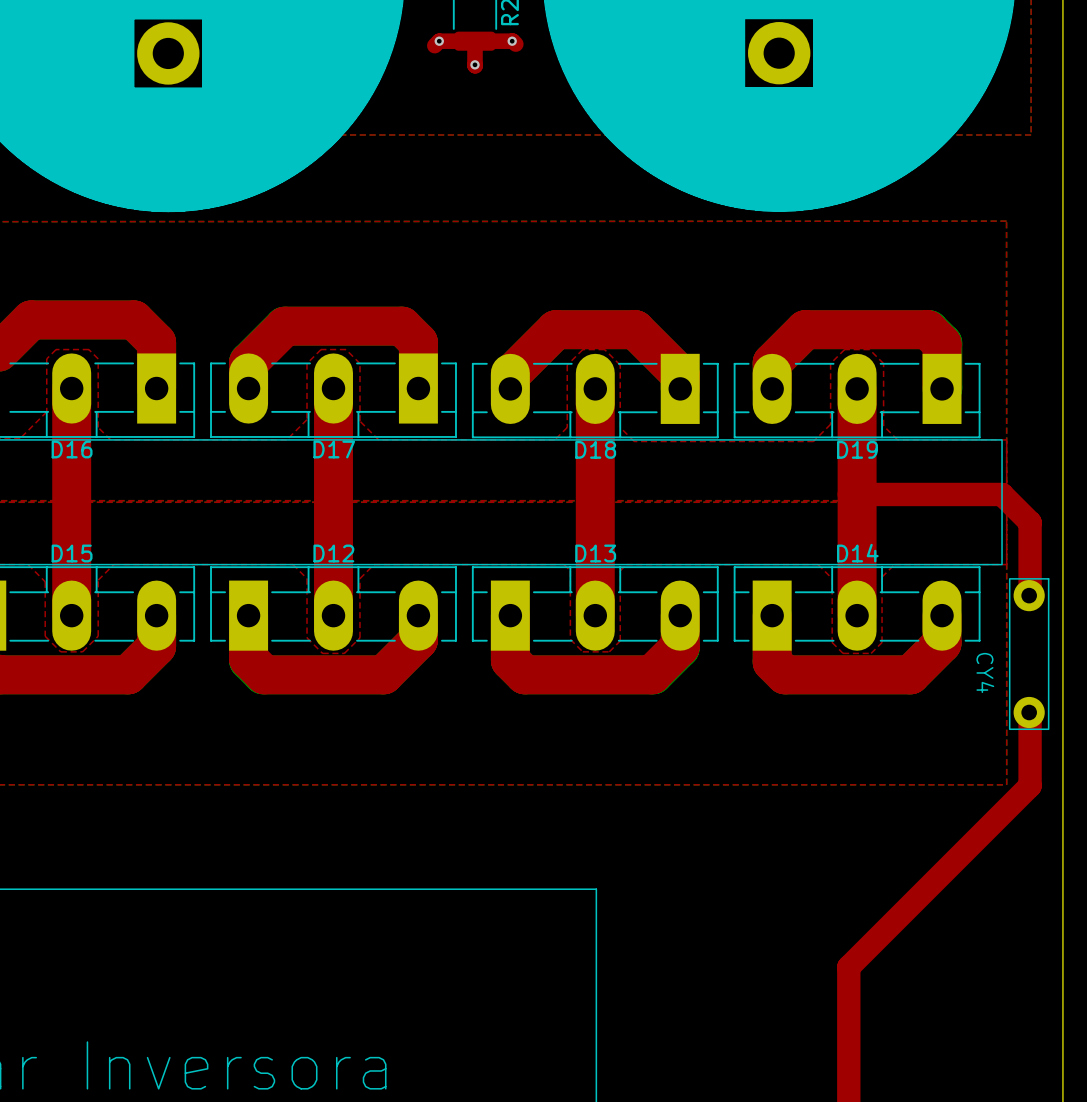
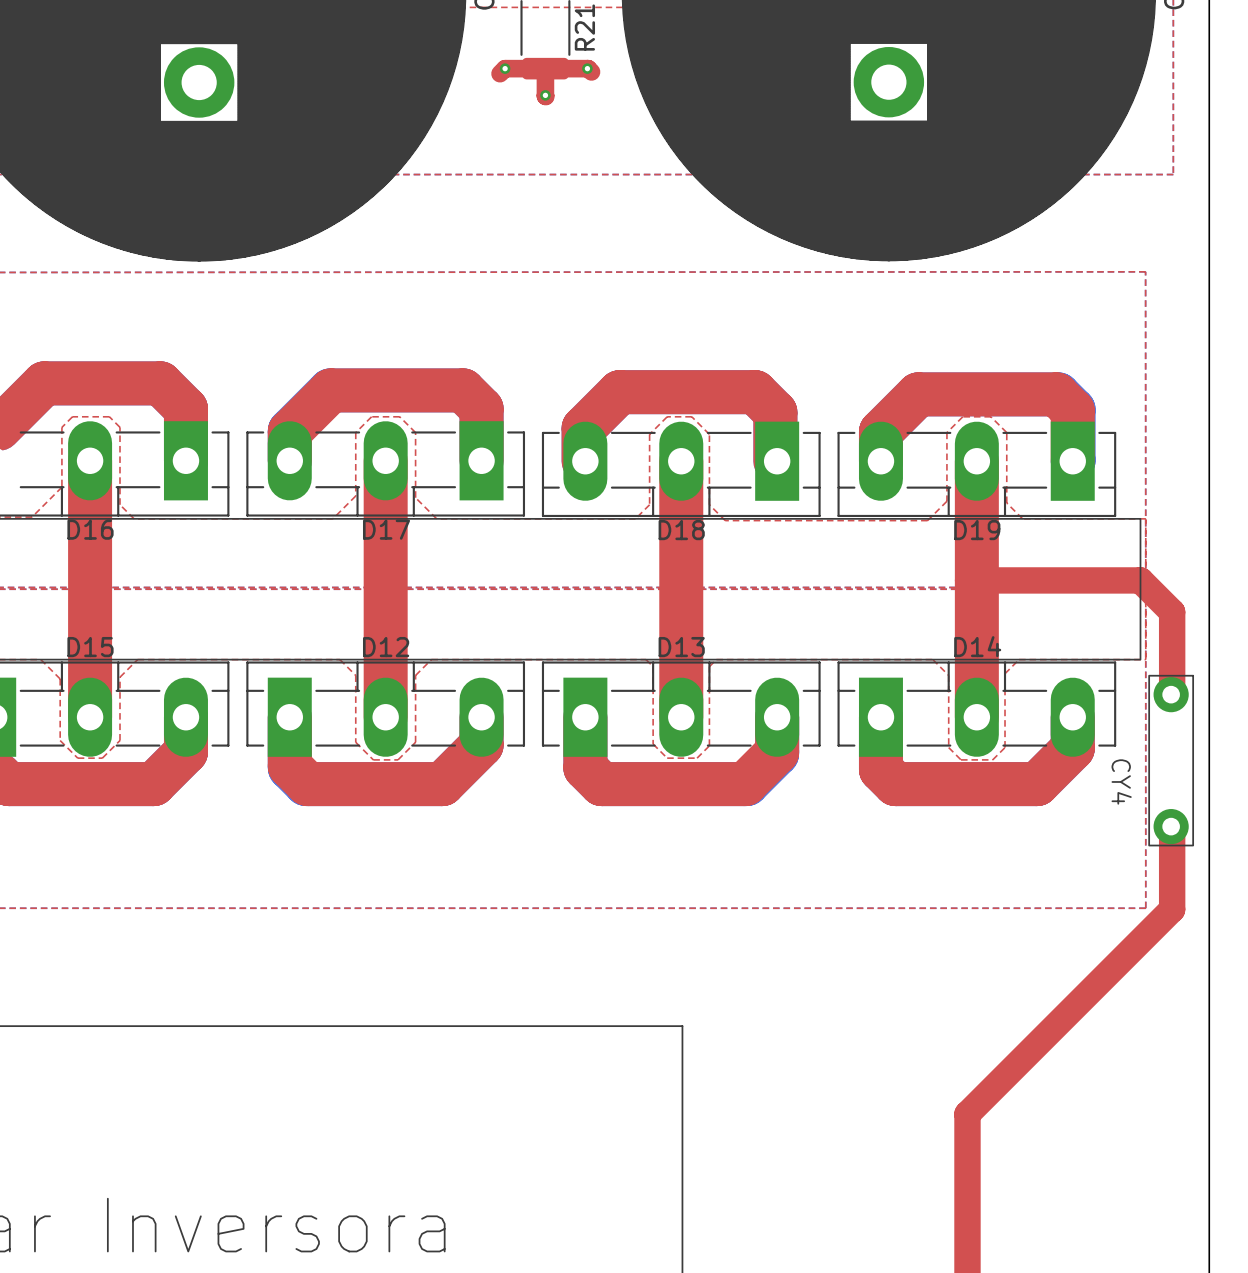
top track: none -> (583, 461) (583, 428) (619, 392) (755, 392) (775, 412) (775, 461)
top track: (510, 388) (510, 375) (555, 329) (635, 329) (680, 374) (680, 388) -> none

